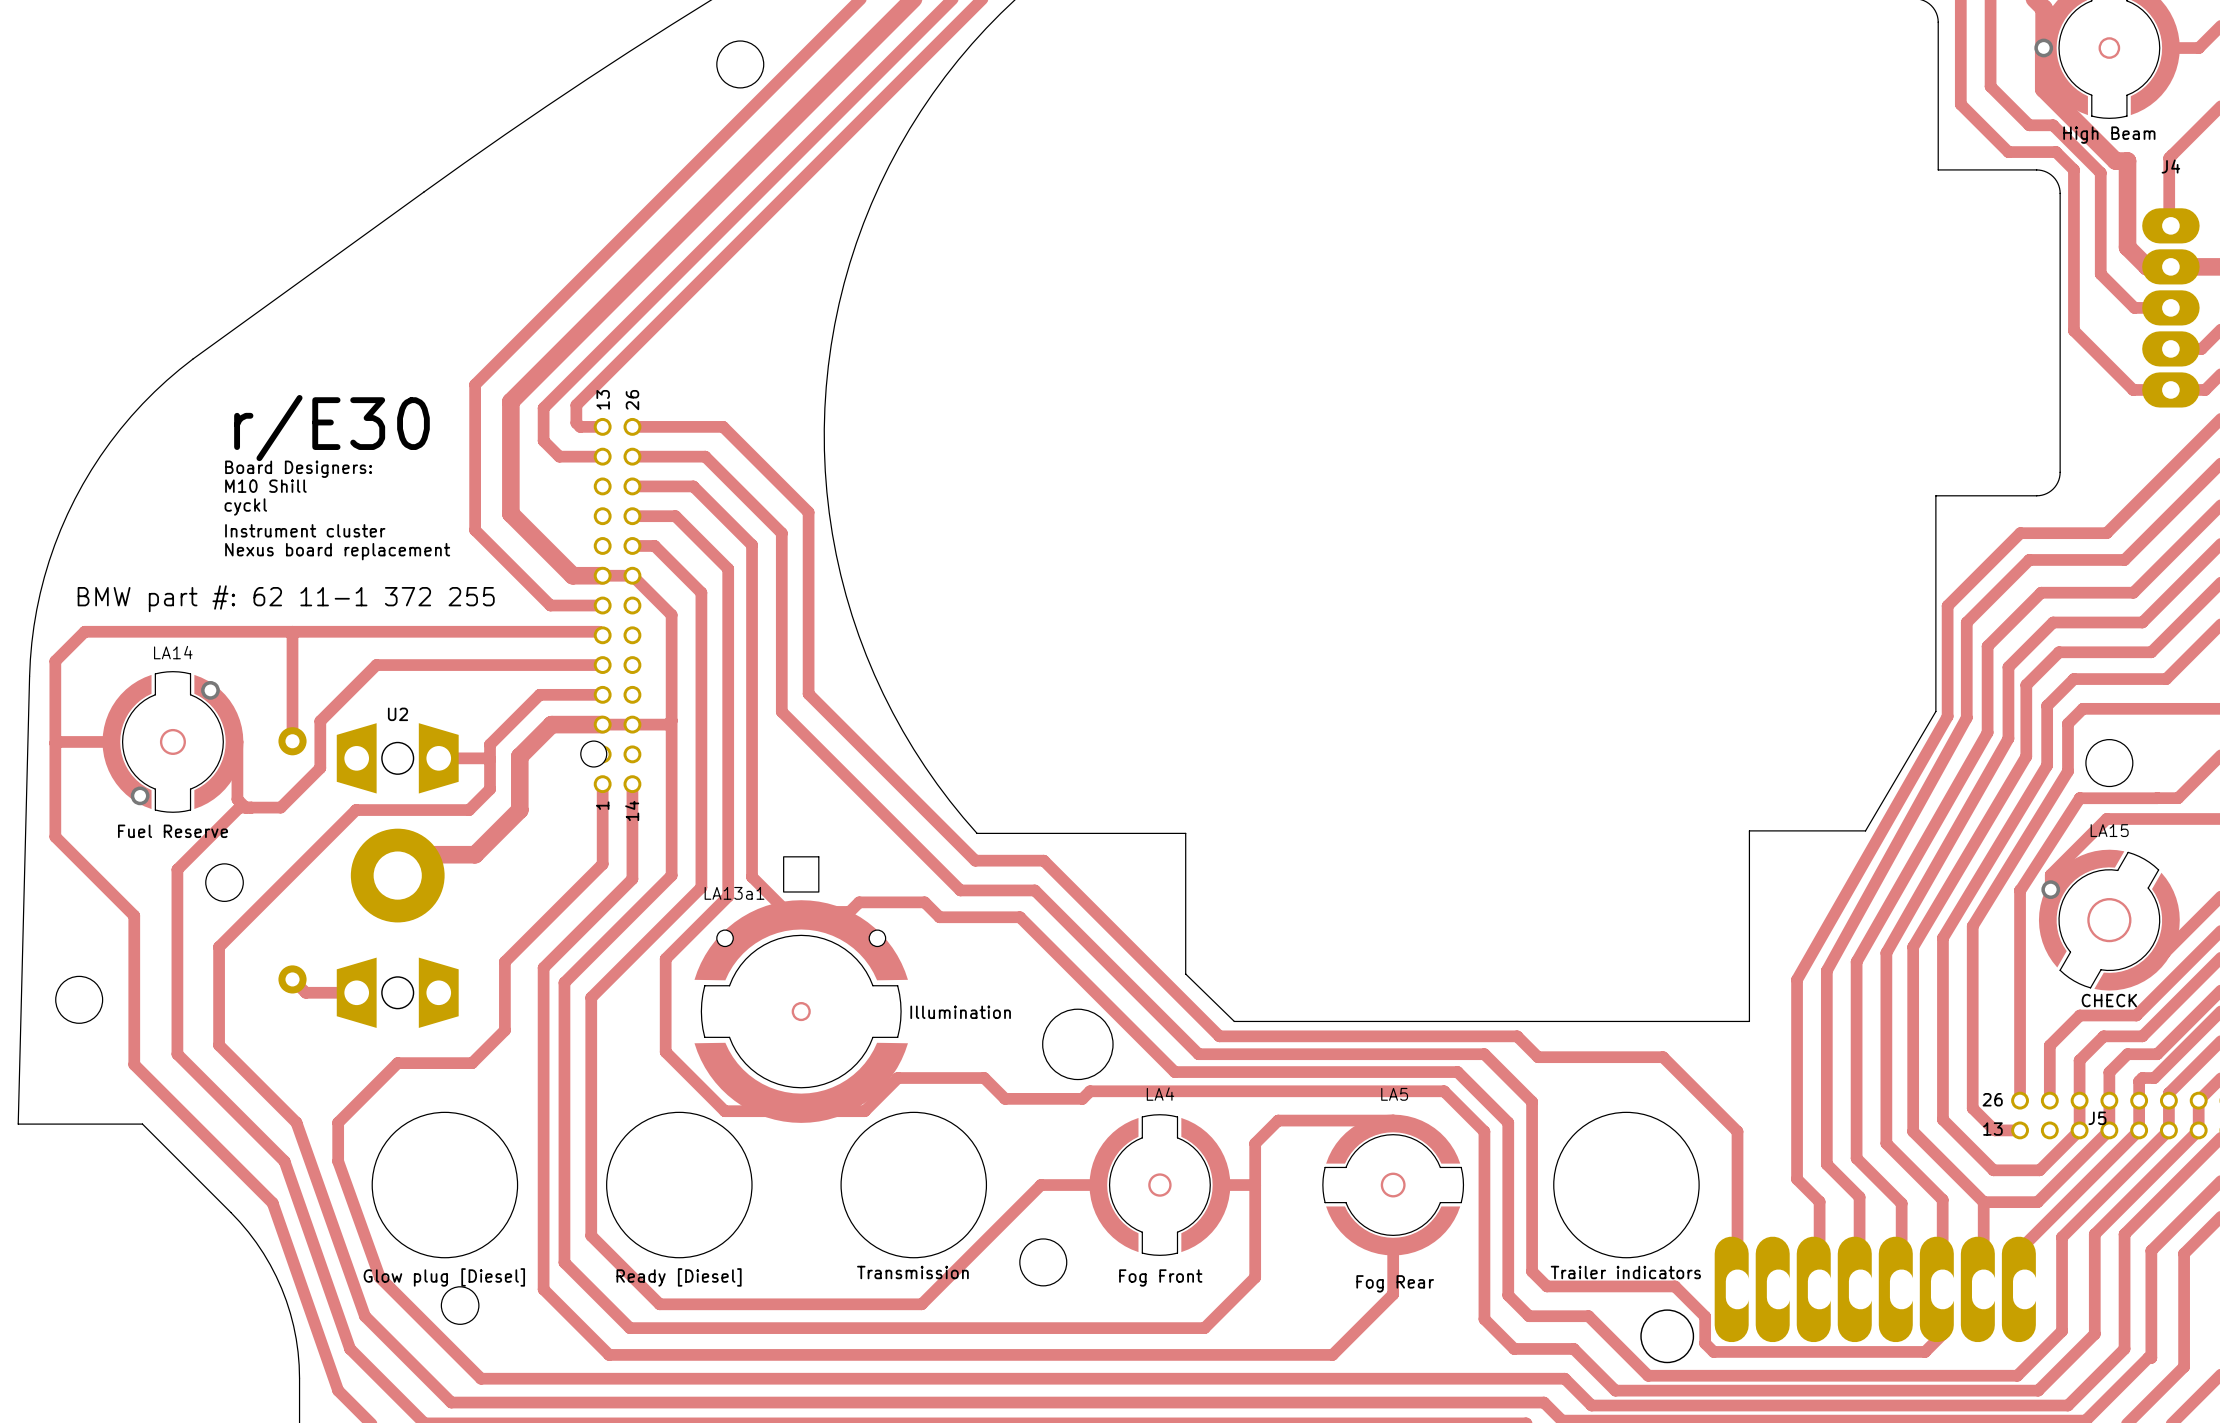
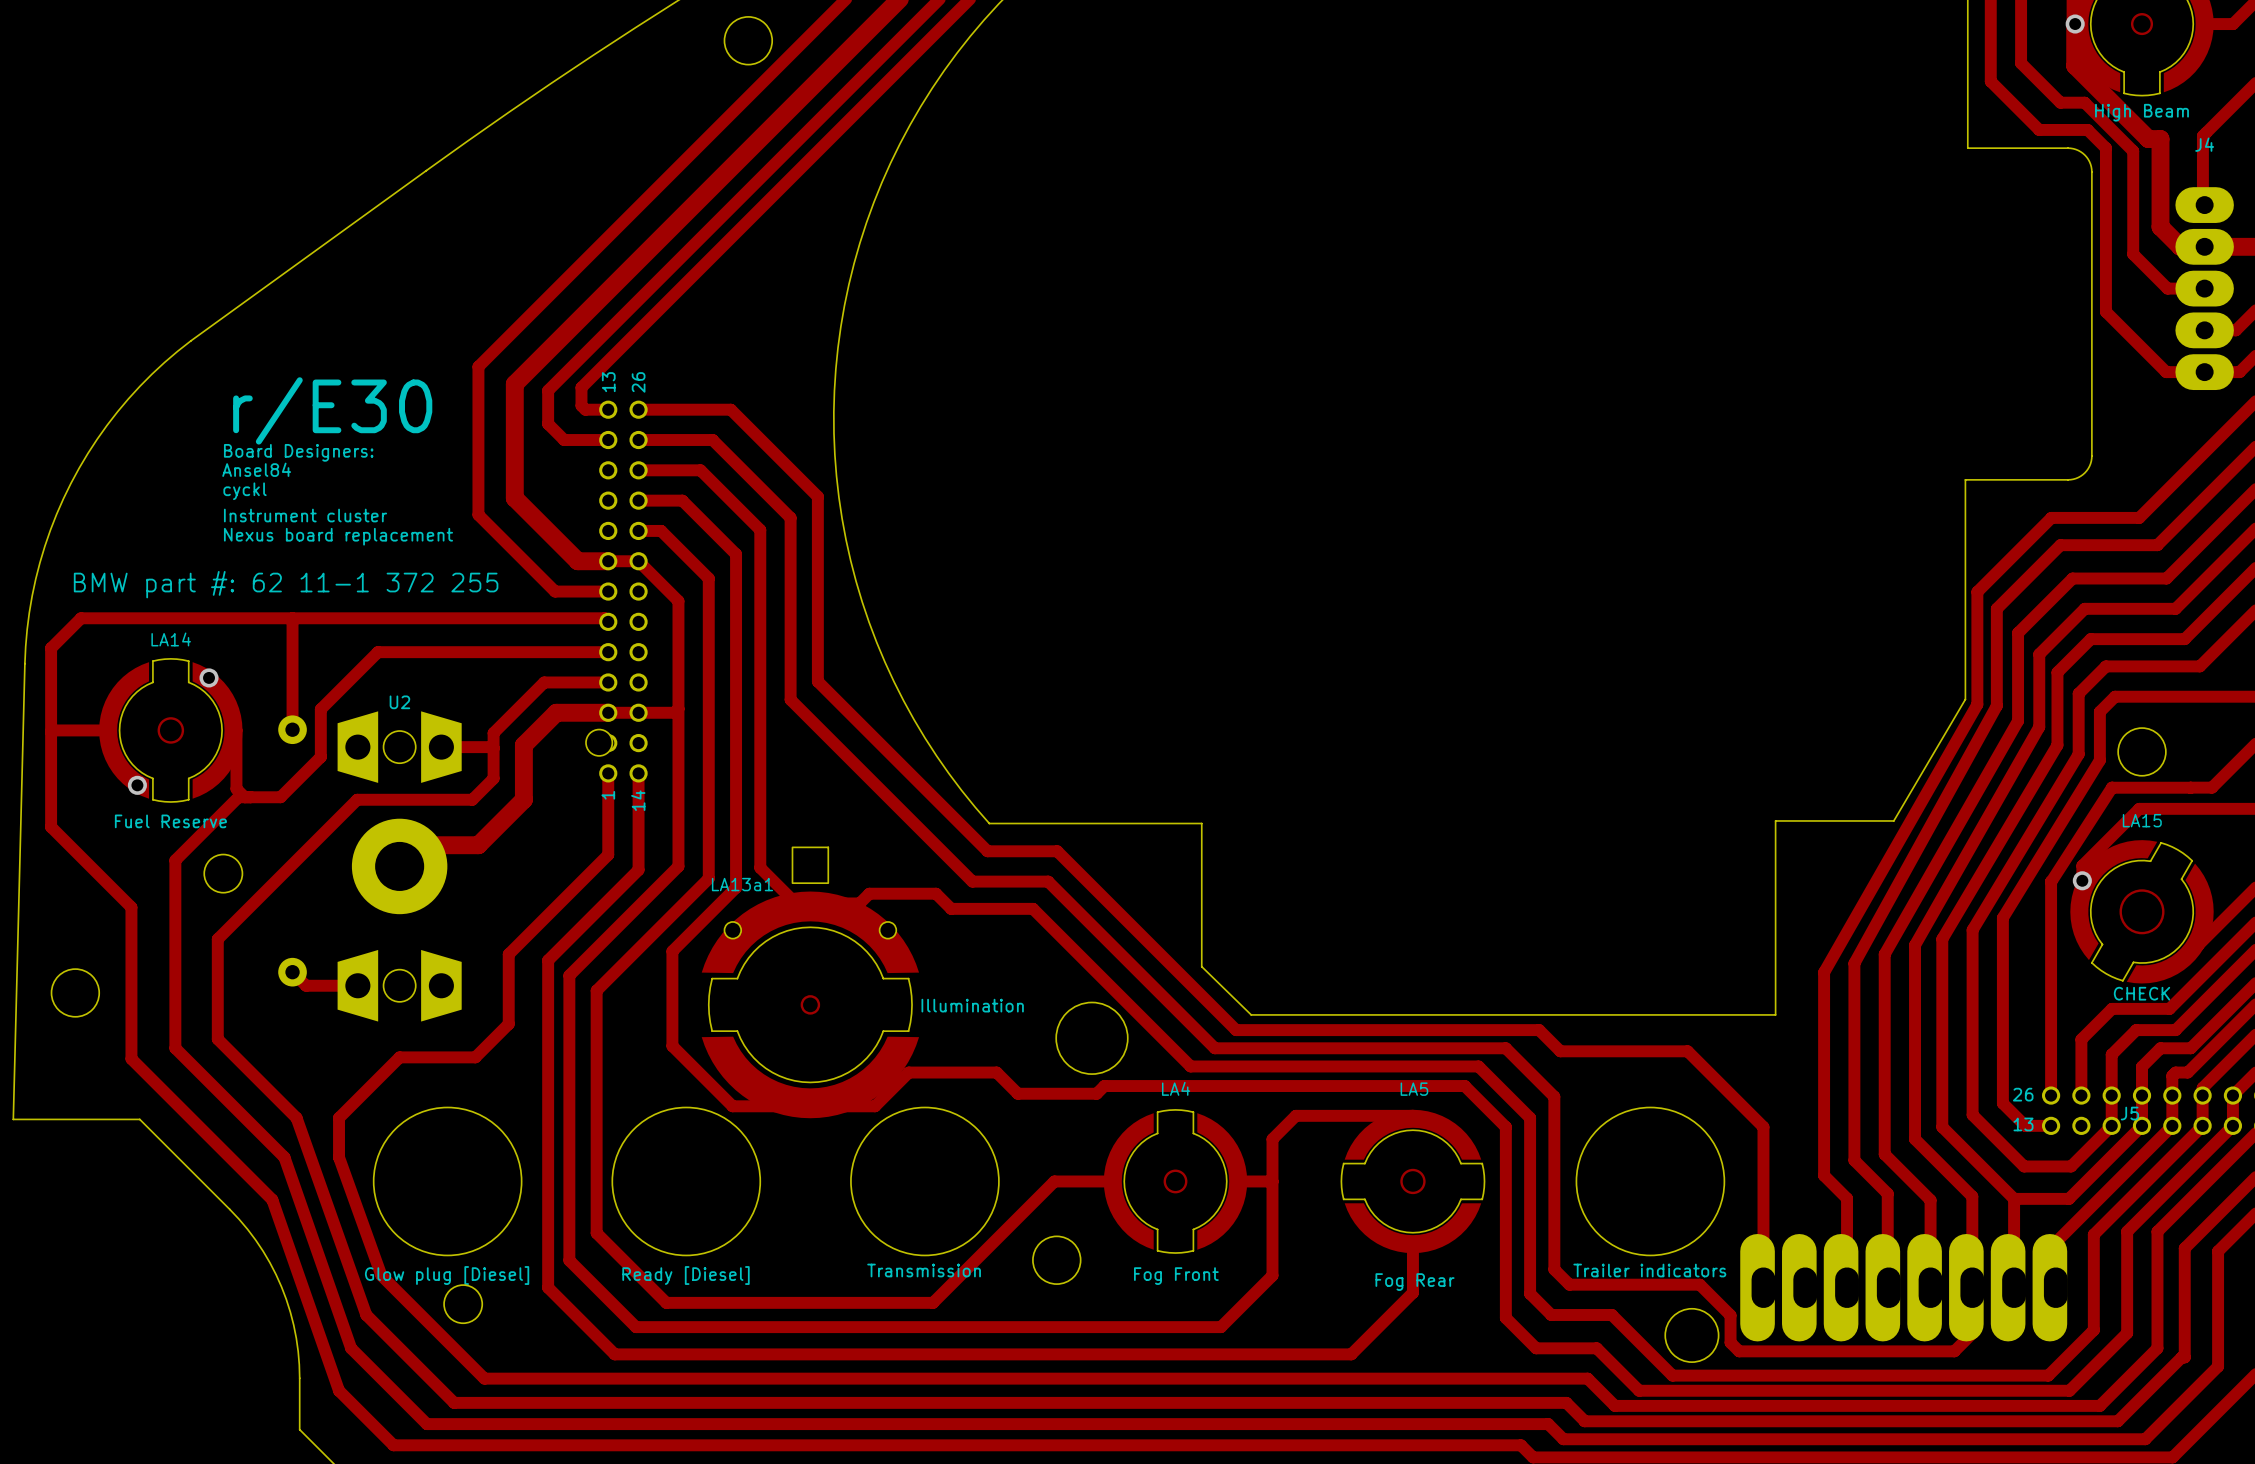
text: M10 Shill (265, 486) -> Ansel84 (256, 469)

